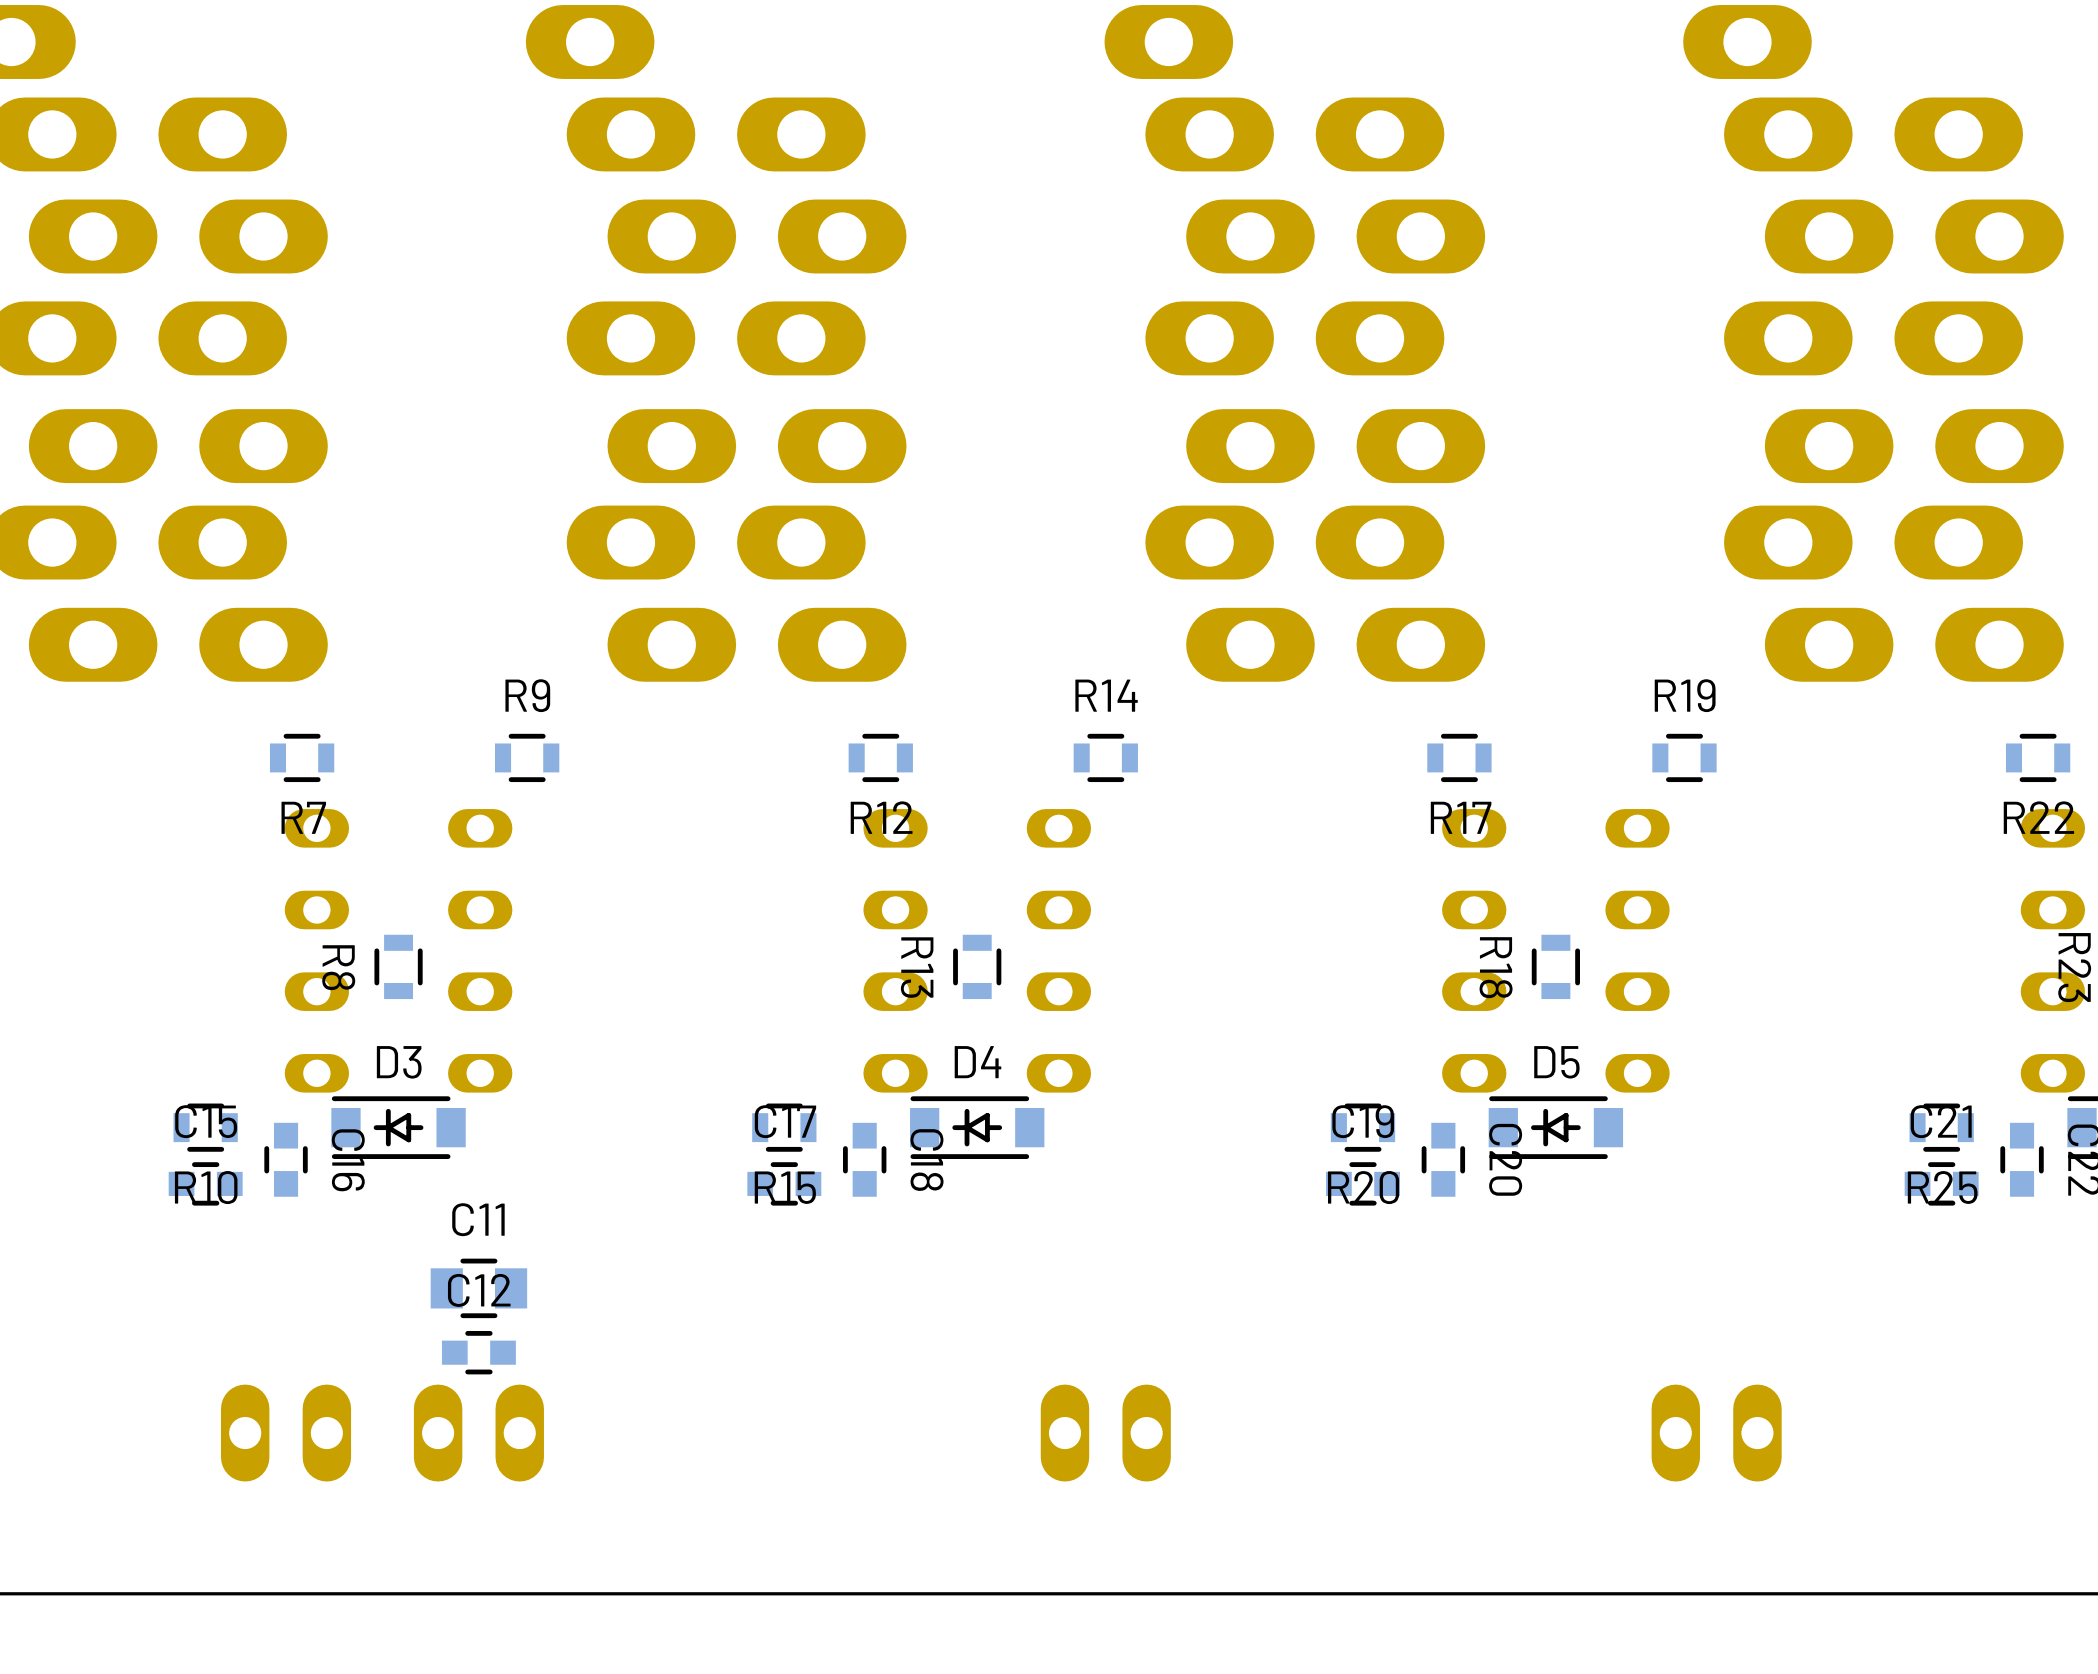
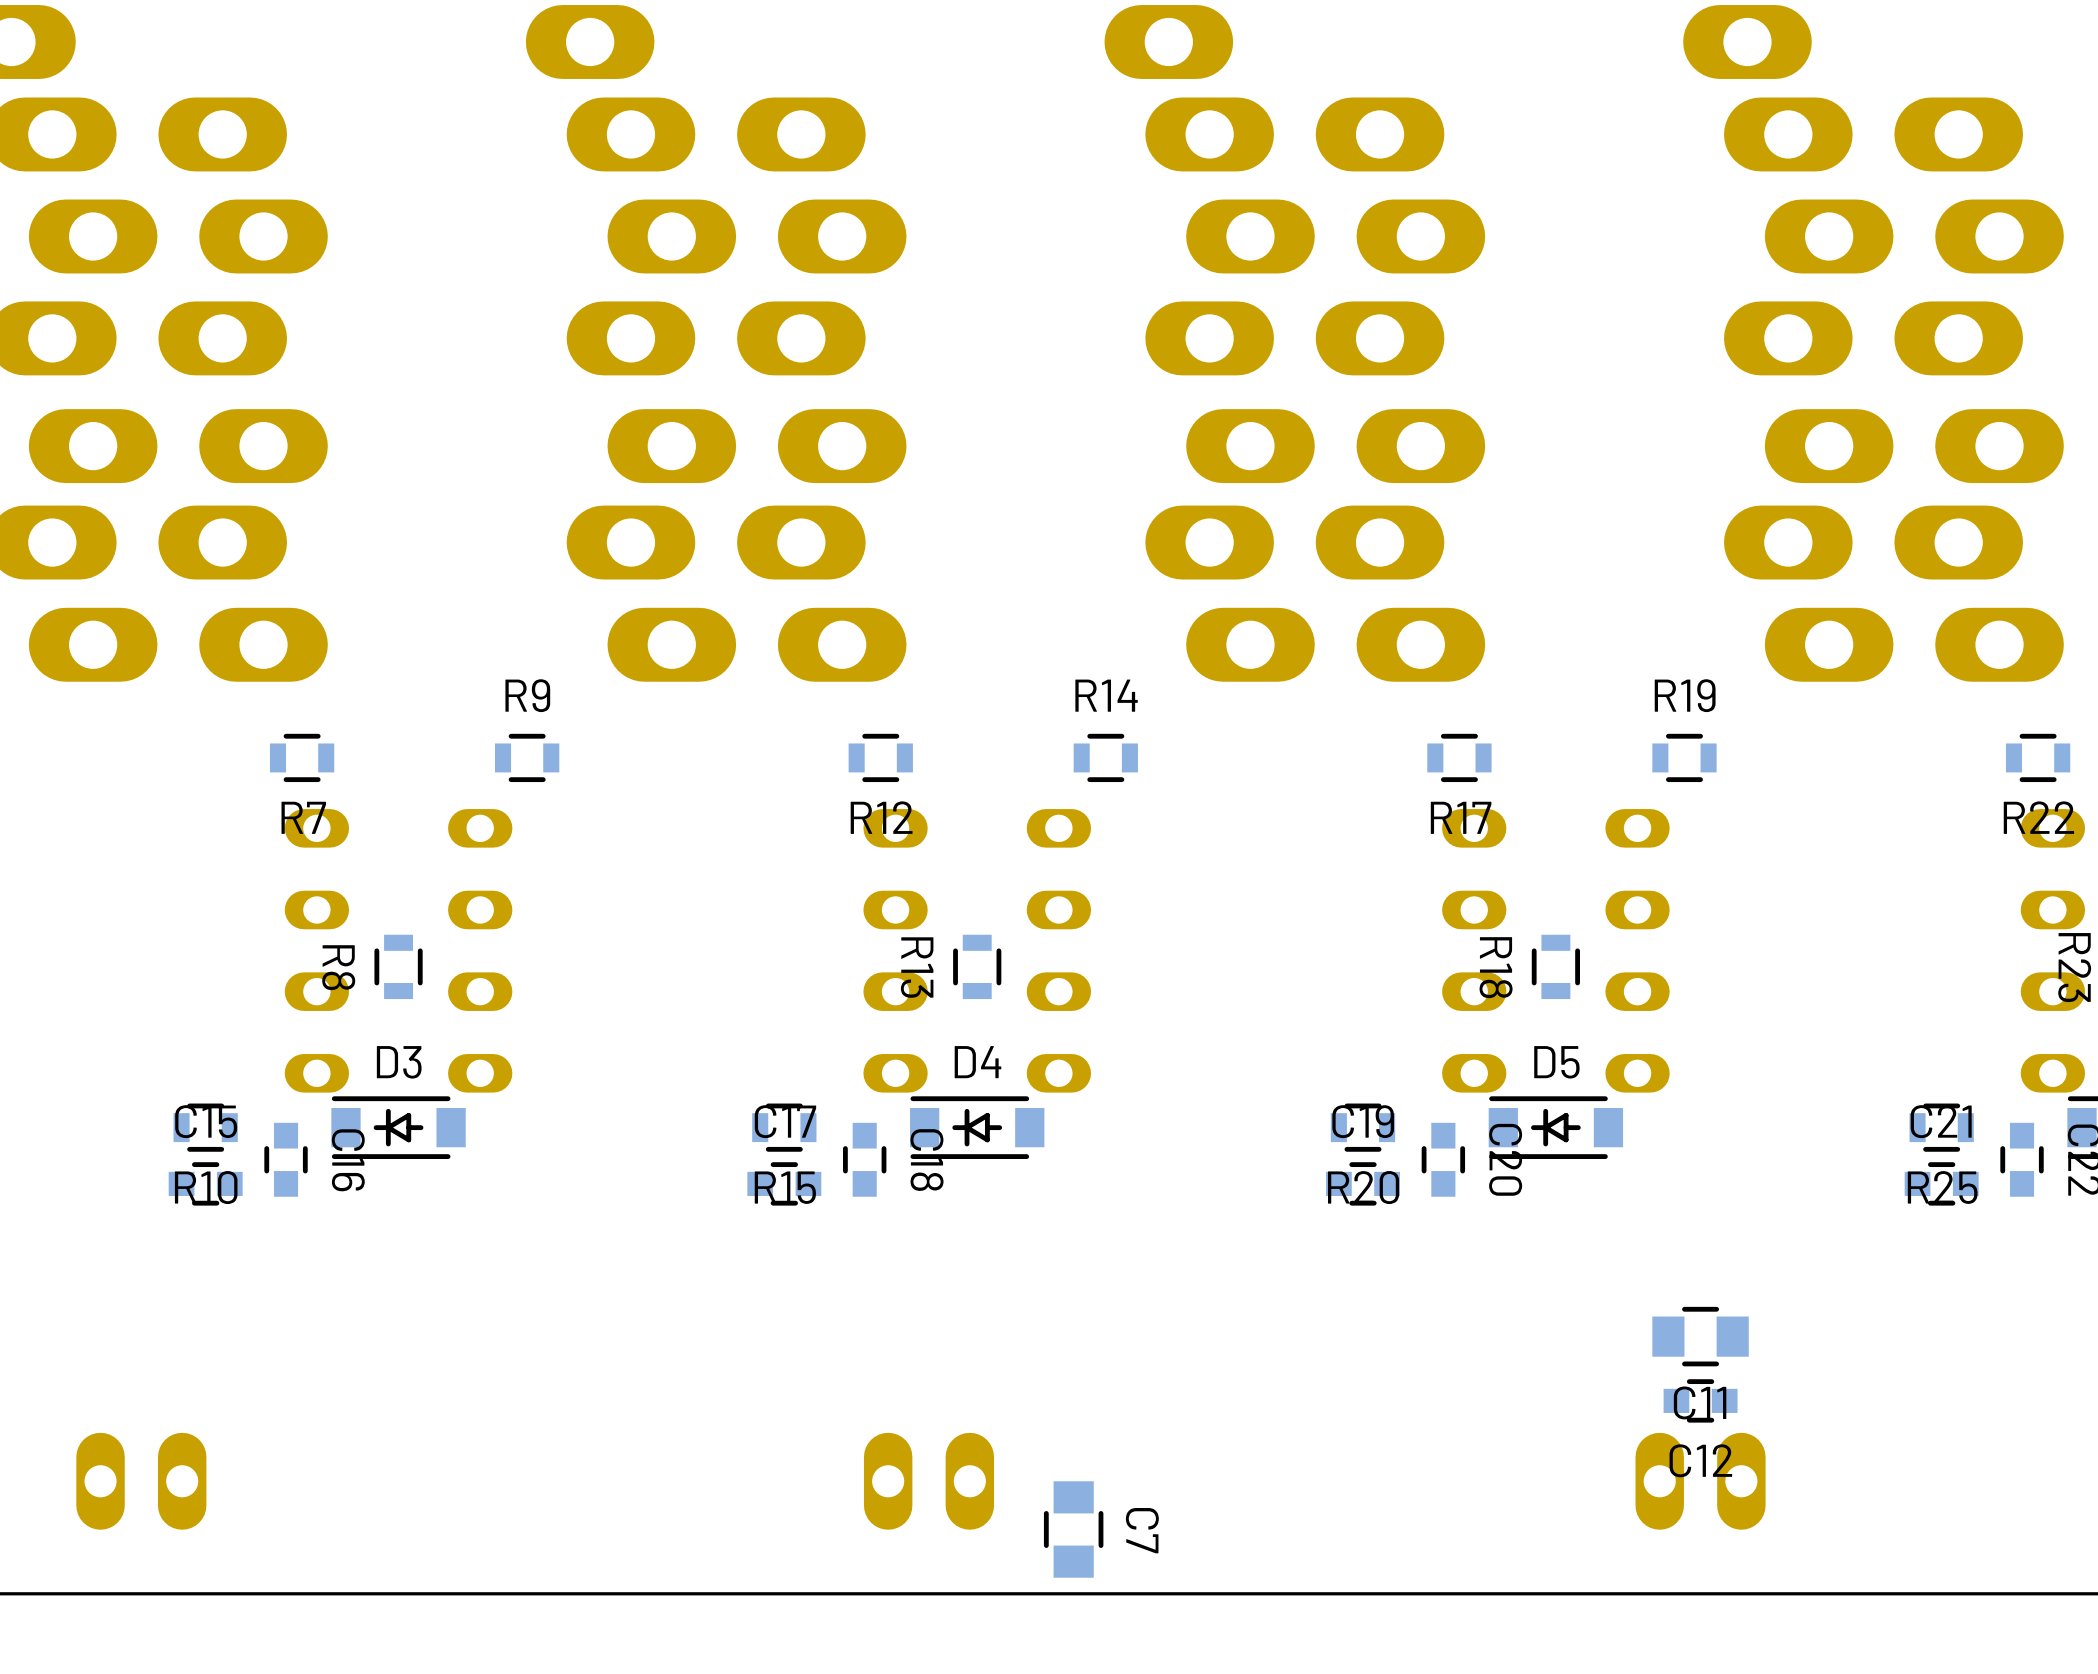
C11 name position: C11 (478, 1219) -> C11 (1700, 1402)
C11 position: (478, 1288) -> (1700, 1336)
C12 name position: C12 (479, 1290) -> C12 (1700, 1460)
C12 position: (478, 1352) -> (1700, 1400)
part position: (286, 1433) -> (141, 1481)
part: (478, 1433) -> none
part position: (1105, 1433) -> (928, 1481)
part position: (1716, 1433) -> (1700, 1481)
C7: none -> (1073, 1529)

